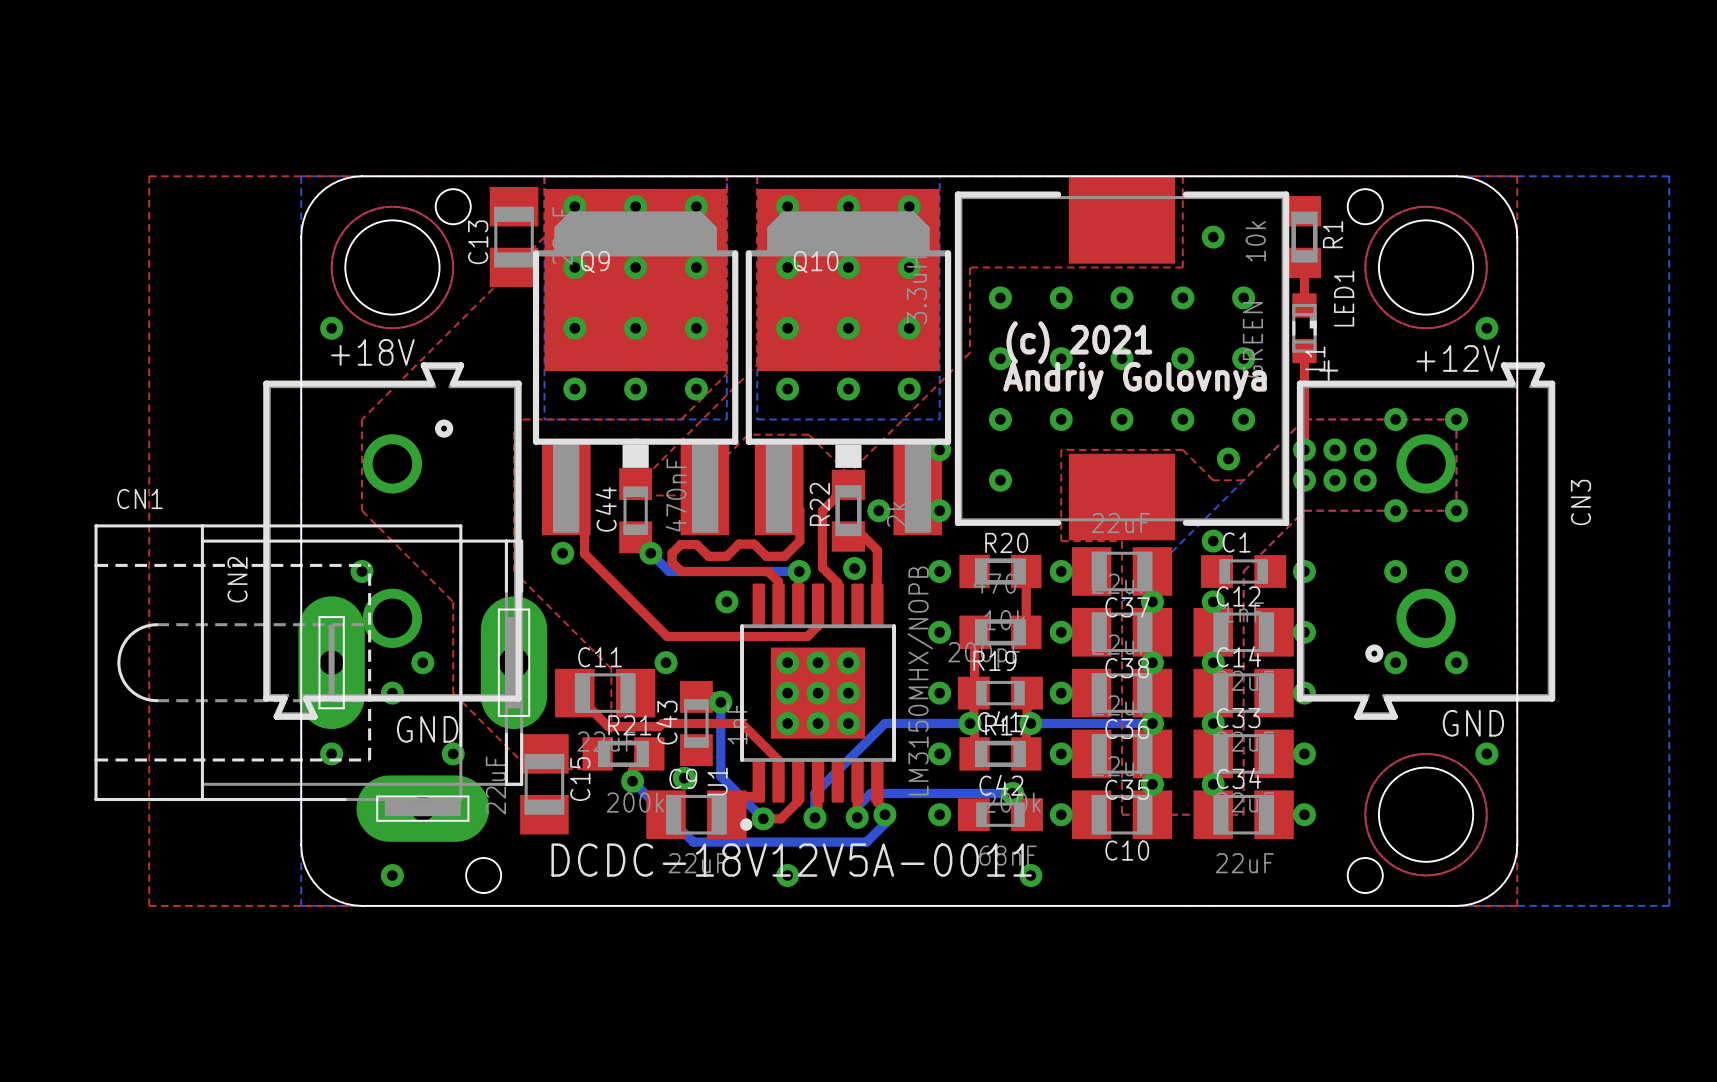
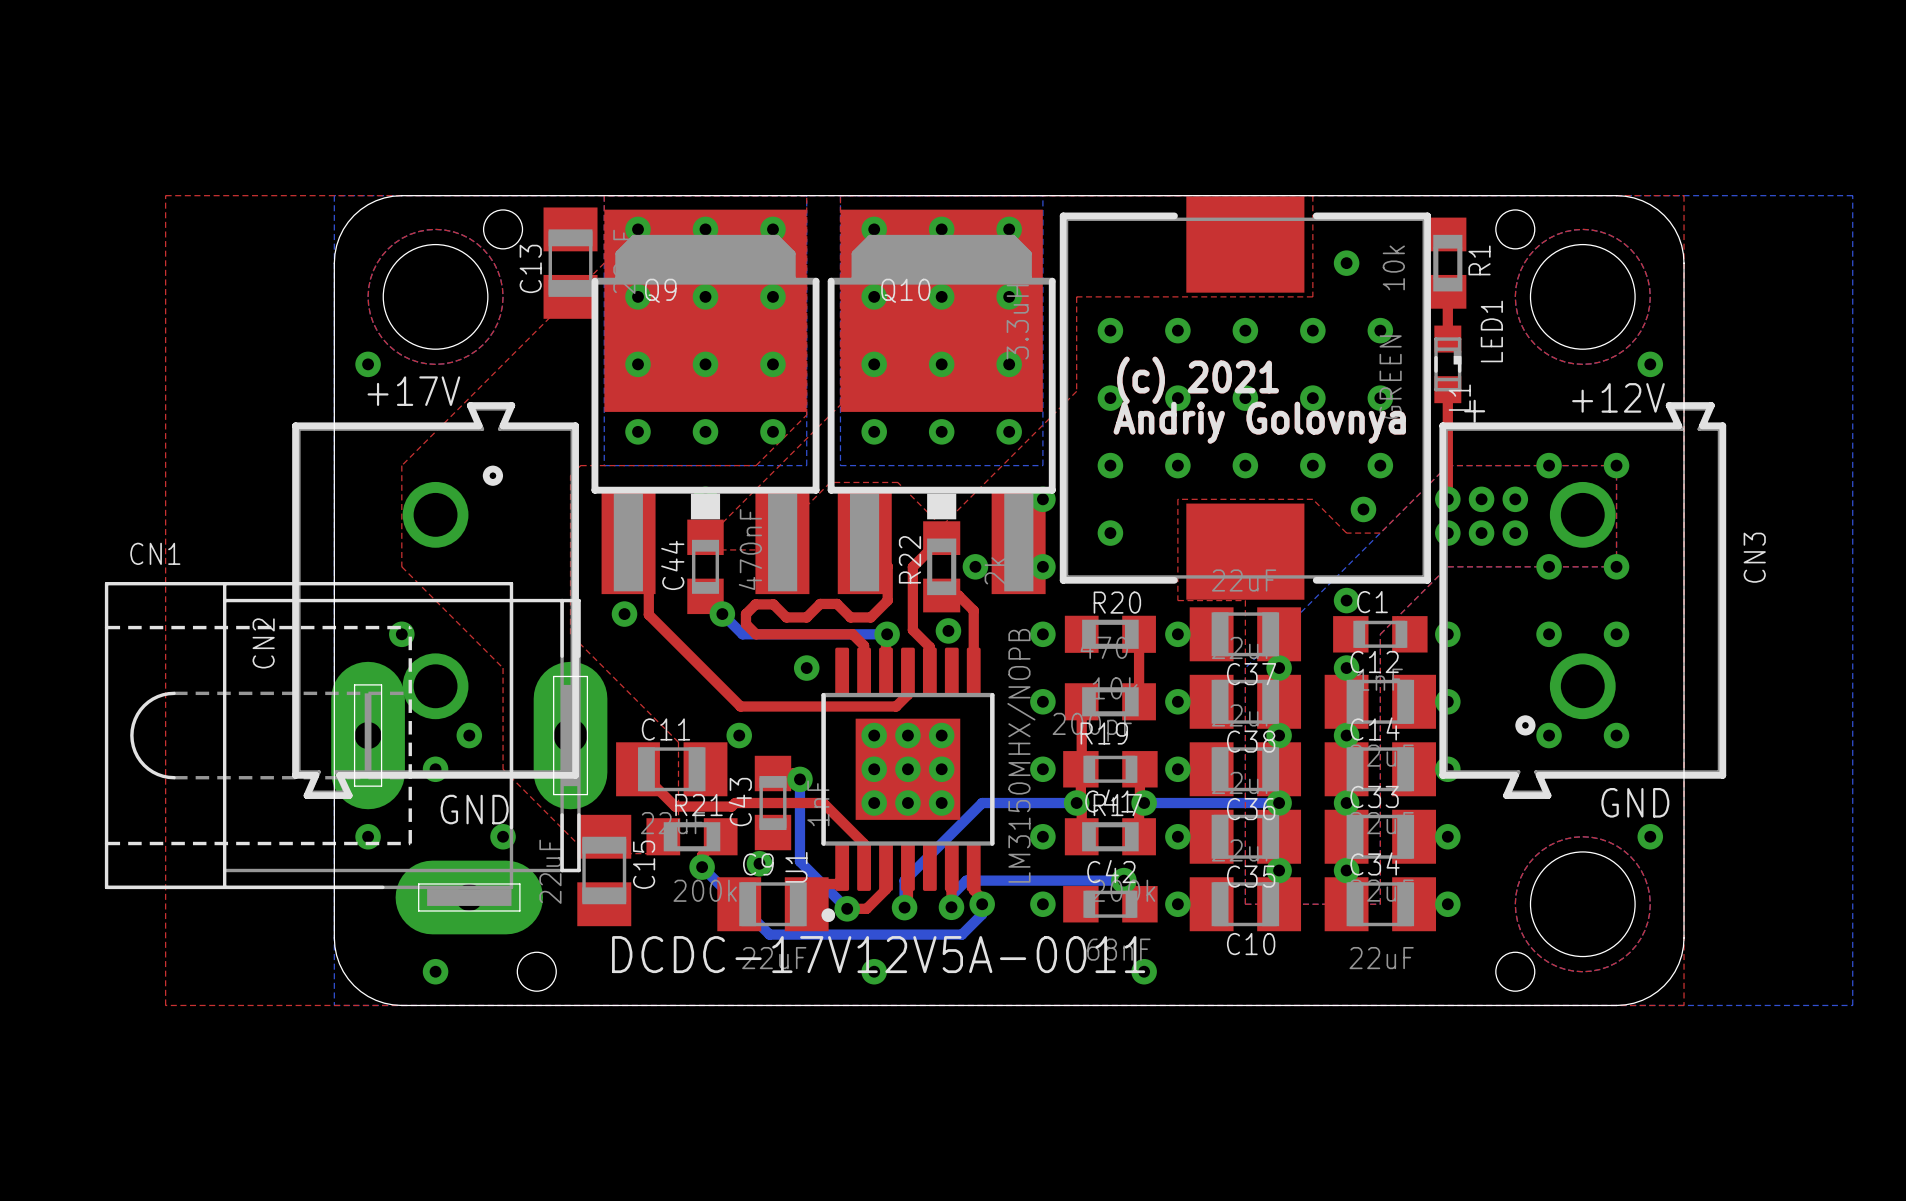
text: +18V (372, 352) -> +17V (413, 391)
text: DCDC-18V12V5A-0011 (791, 860) -> DCDC-17V12V5A-0011 (878, 954)

